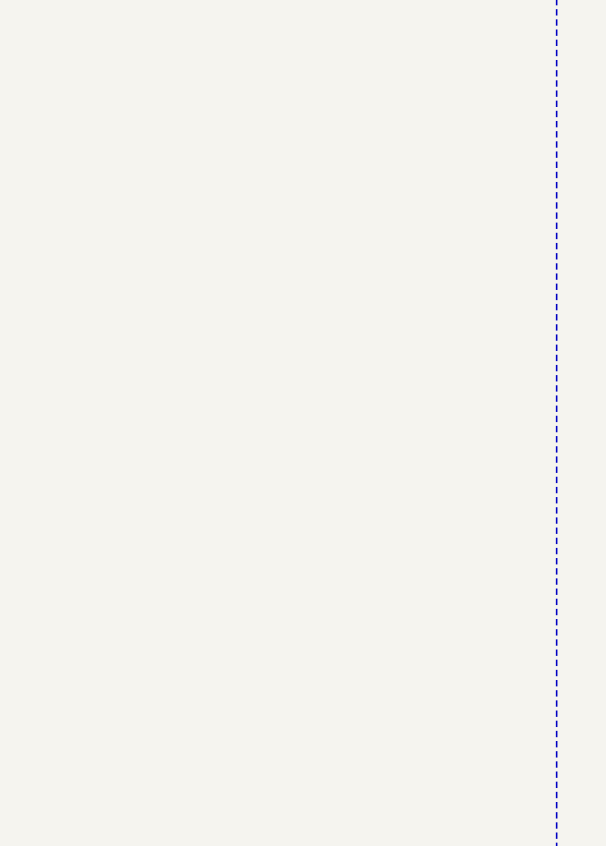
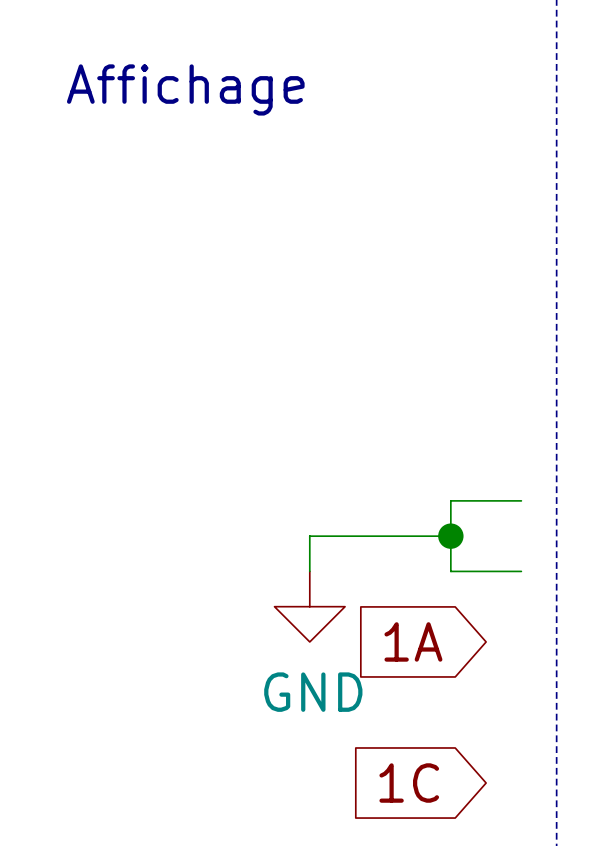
text: none -> Affichage (185, 89)
wire: none -> (521, 500) (450, 500) (450, 571) (521, 571)
wire: none -> (450, 536) (309, 536) (309, 571)
junction: none -> (450, 536)
power symbol: none -> GND (309, 606)
global label: none -> 1A (413, 641)
global label: none -> 1C (409, 783)

